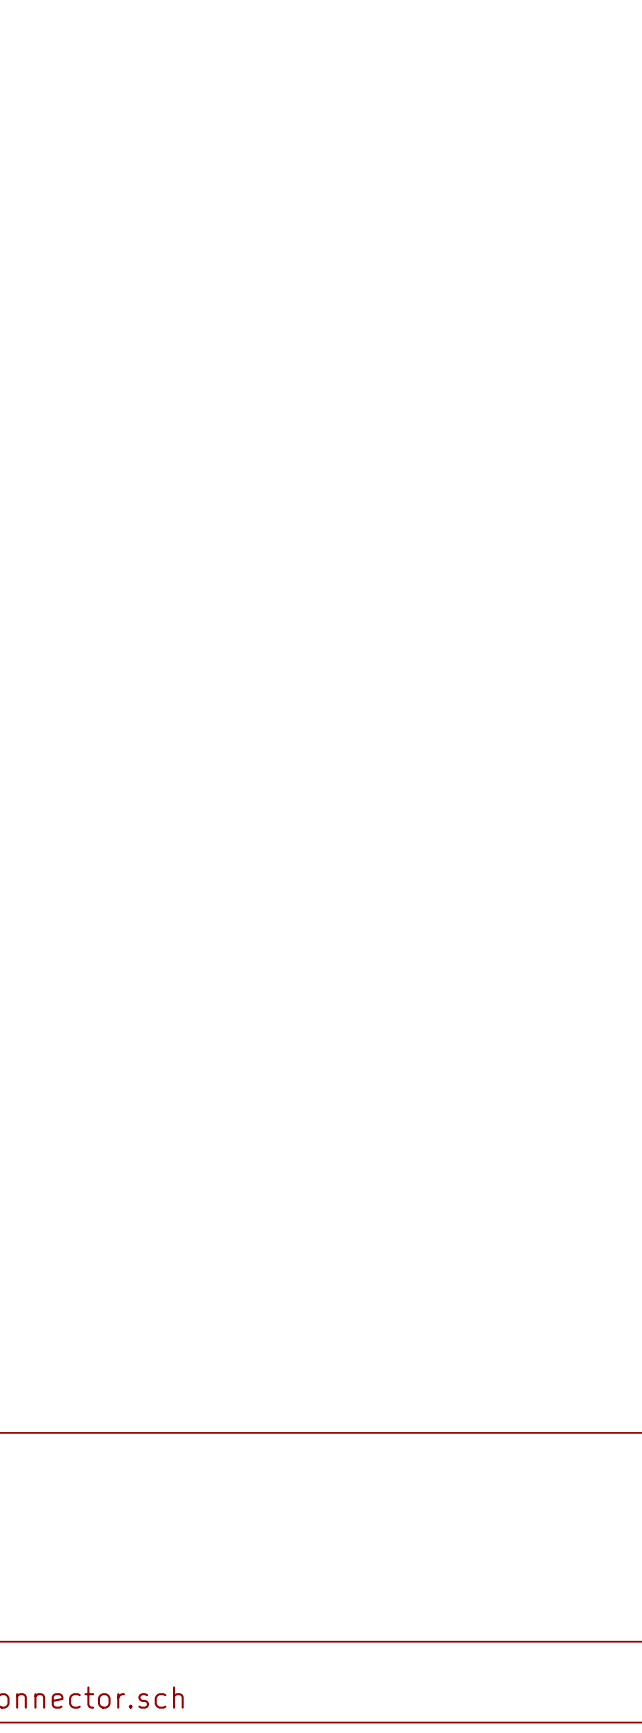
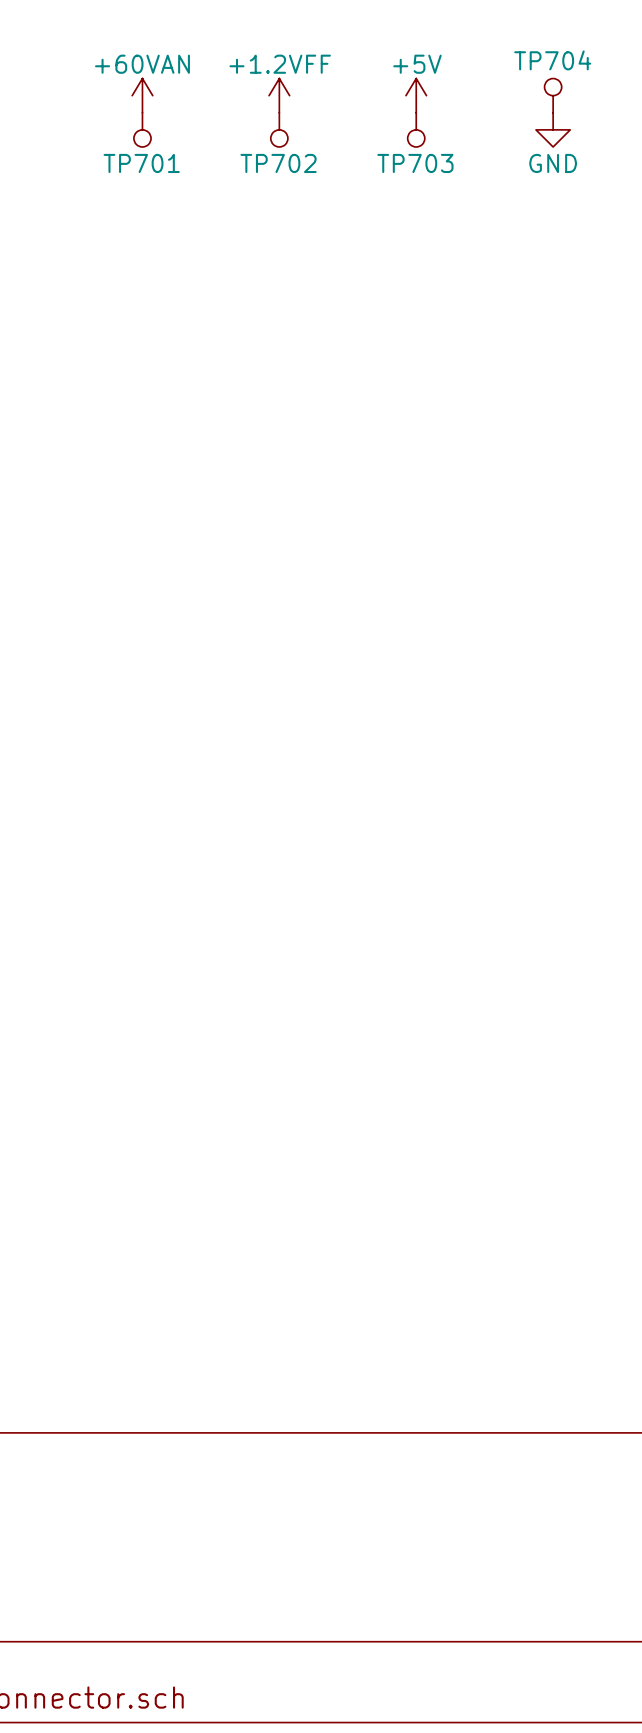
power symbol: none -> +60VAN (142, 95)
power symbol: none -> +1.2VFF (279, 95)
power symbol: none -> +5V (416, 95)
TP704: none -> (553, 95)
TP701: none -> (142, 129)
TP702: none -> (279, 129)
TP703: none -> (416, 129)
power symbol: none -> GND (553, 129)

